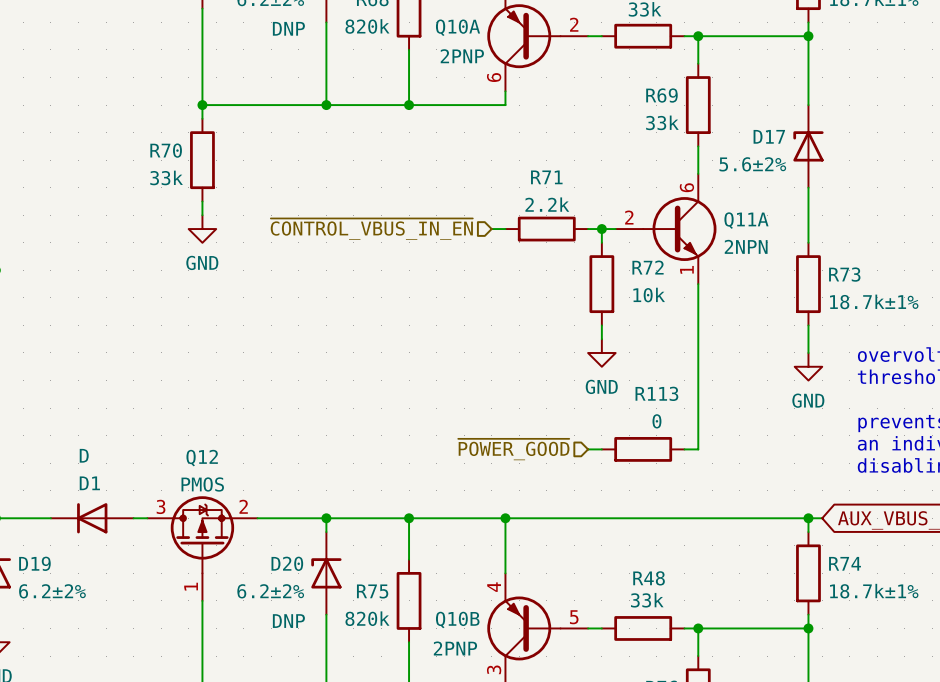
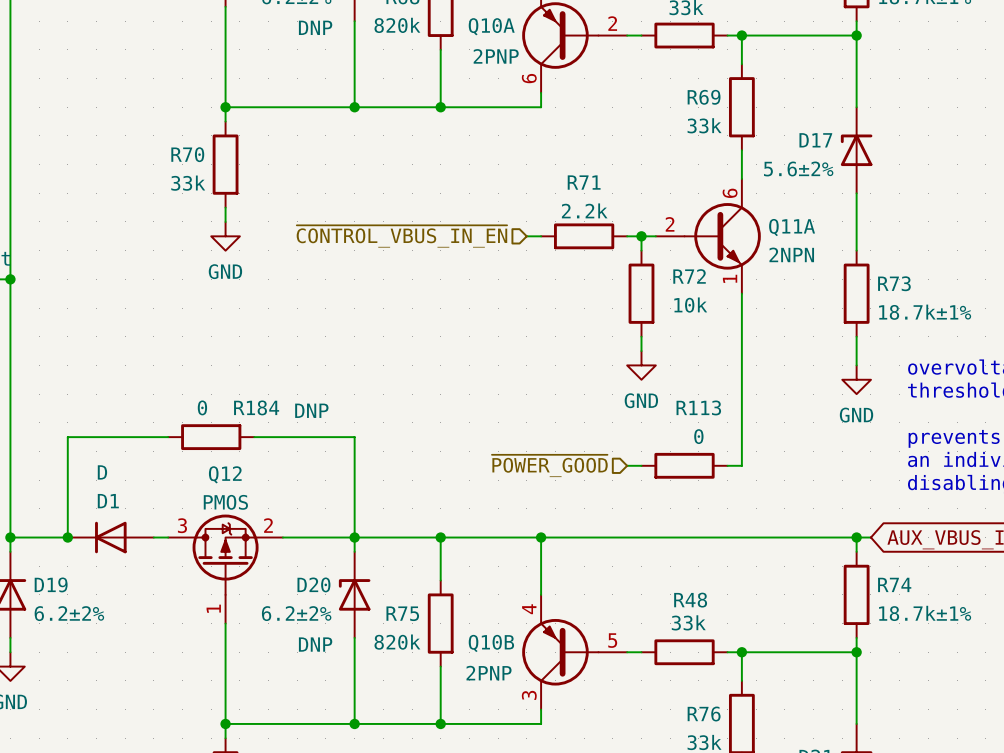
wire: none -> (168, 437) (67, 437) (67, 537)
R184: none -> 0 (211, 437)
wire: none -> (254, 437) (354, 437) (354, 537)
junction: none -> (67, 537)

